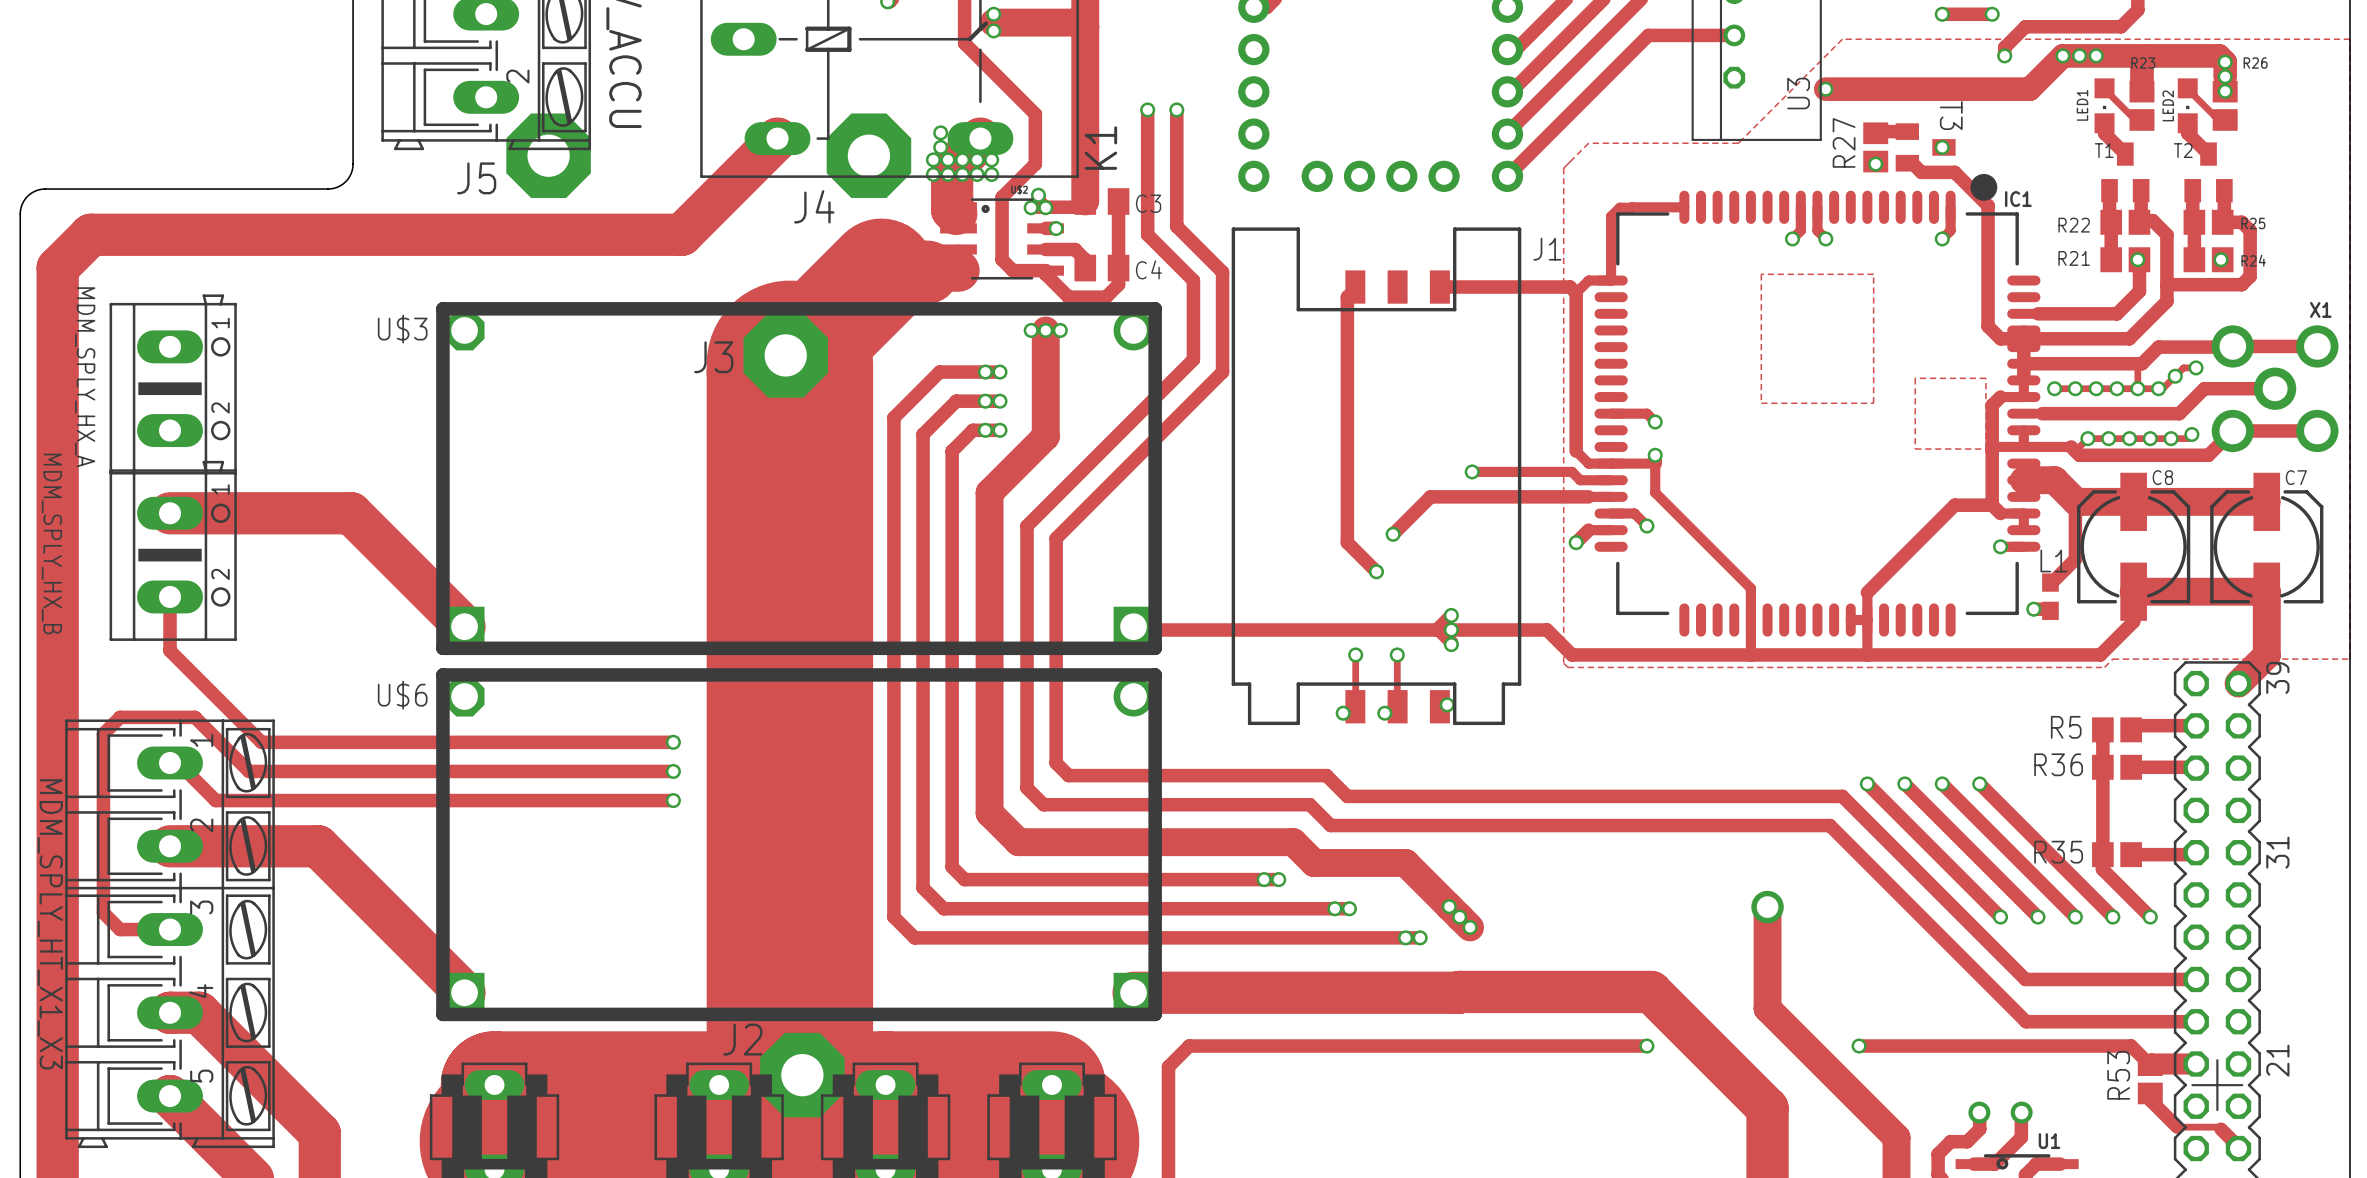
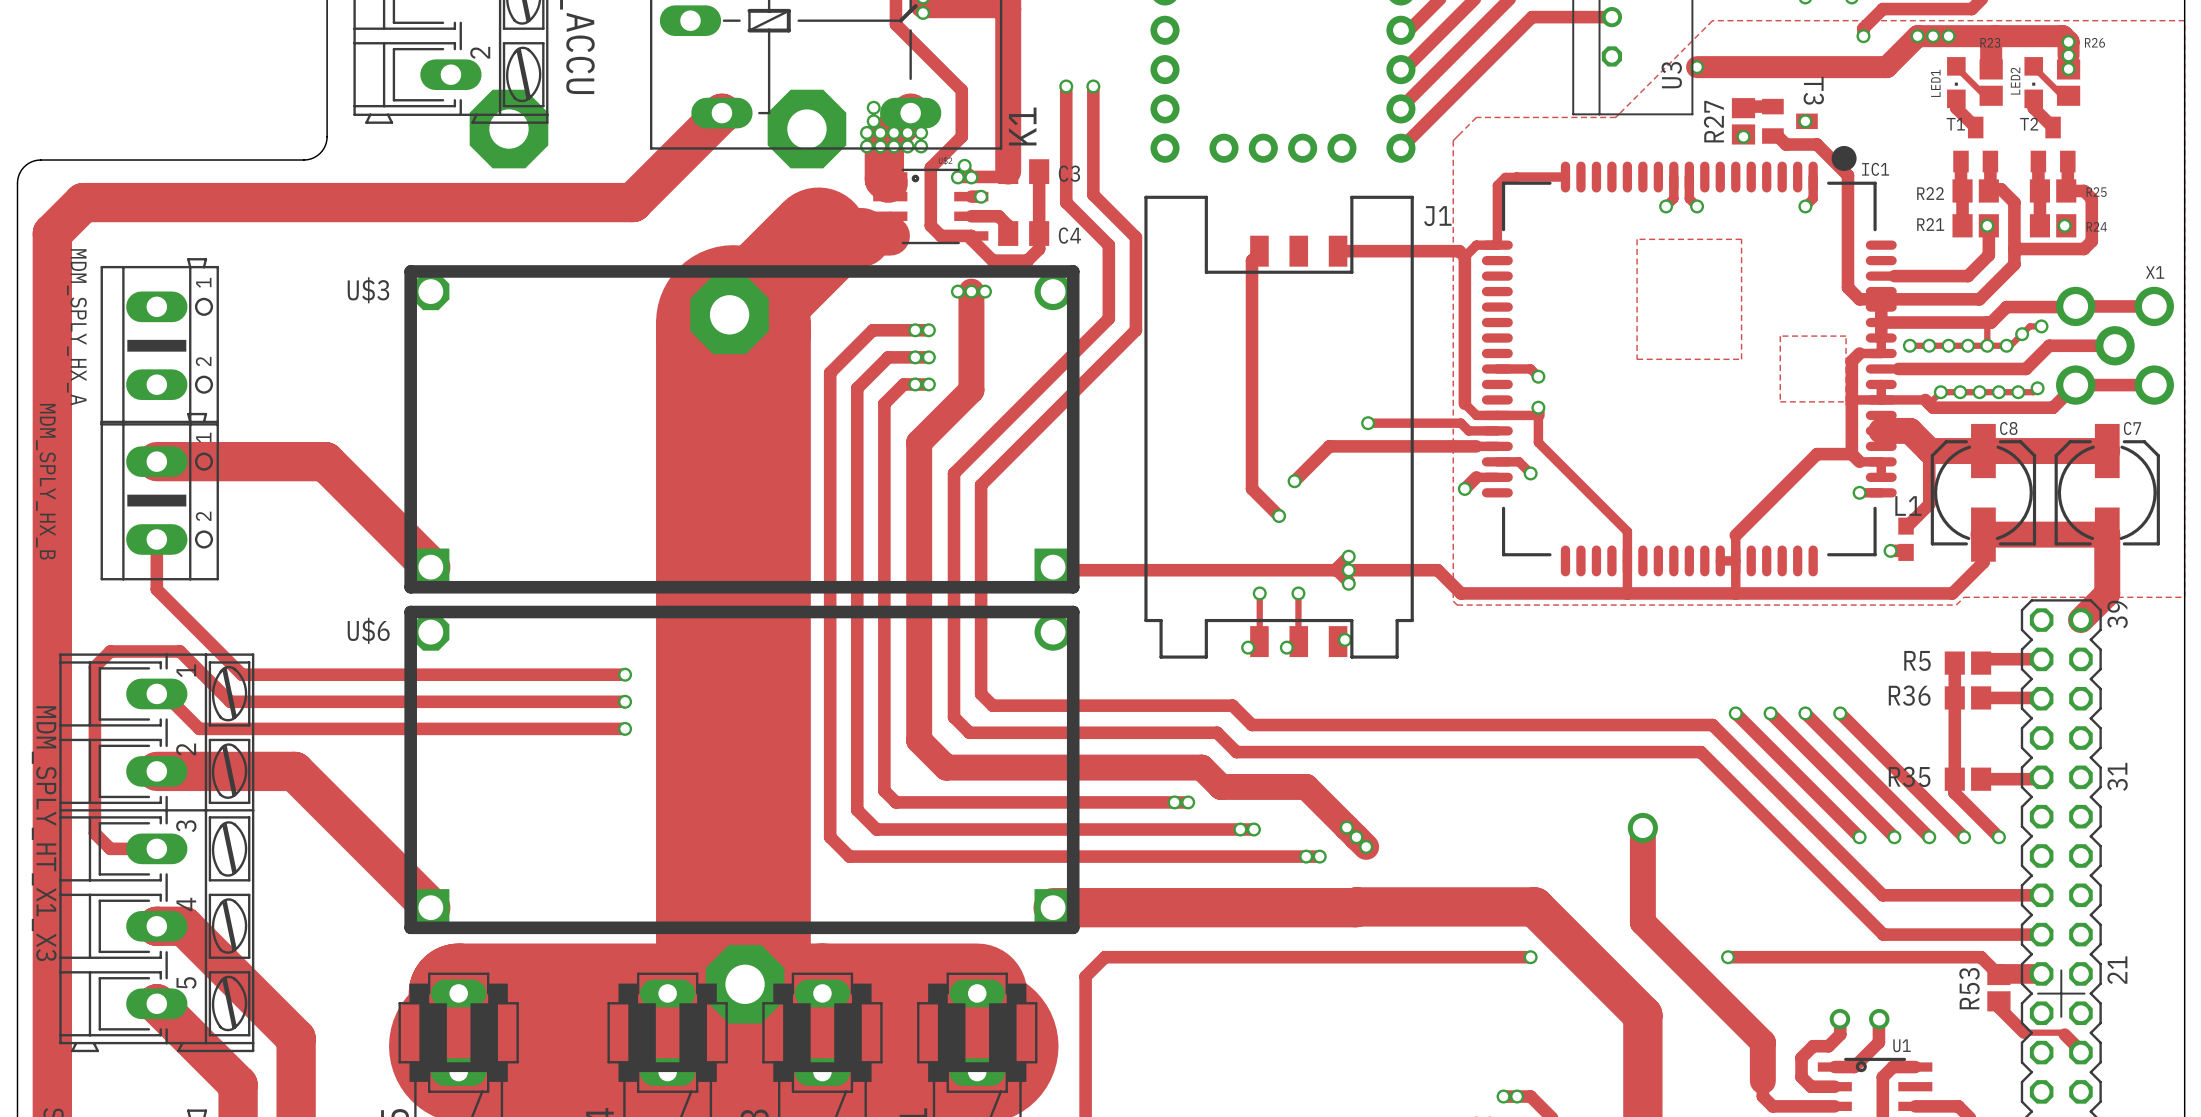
text: J5 (476, 178) -> none
text: J4 (814, 206) -> none
text: J3 (713, 357) -> none
text: J2 (742, 1039) -> none

